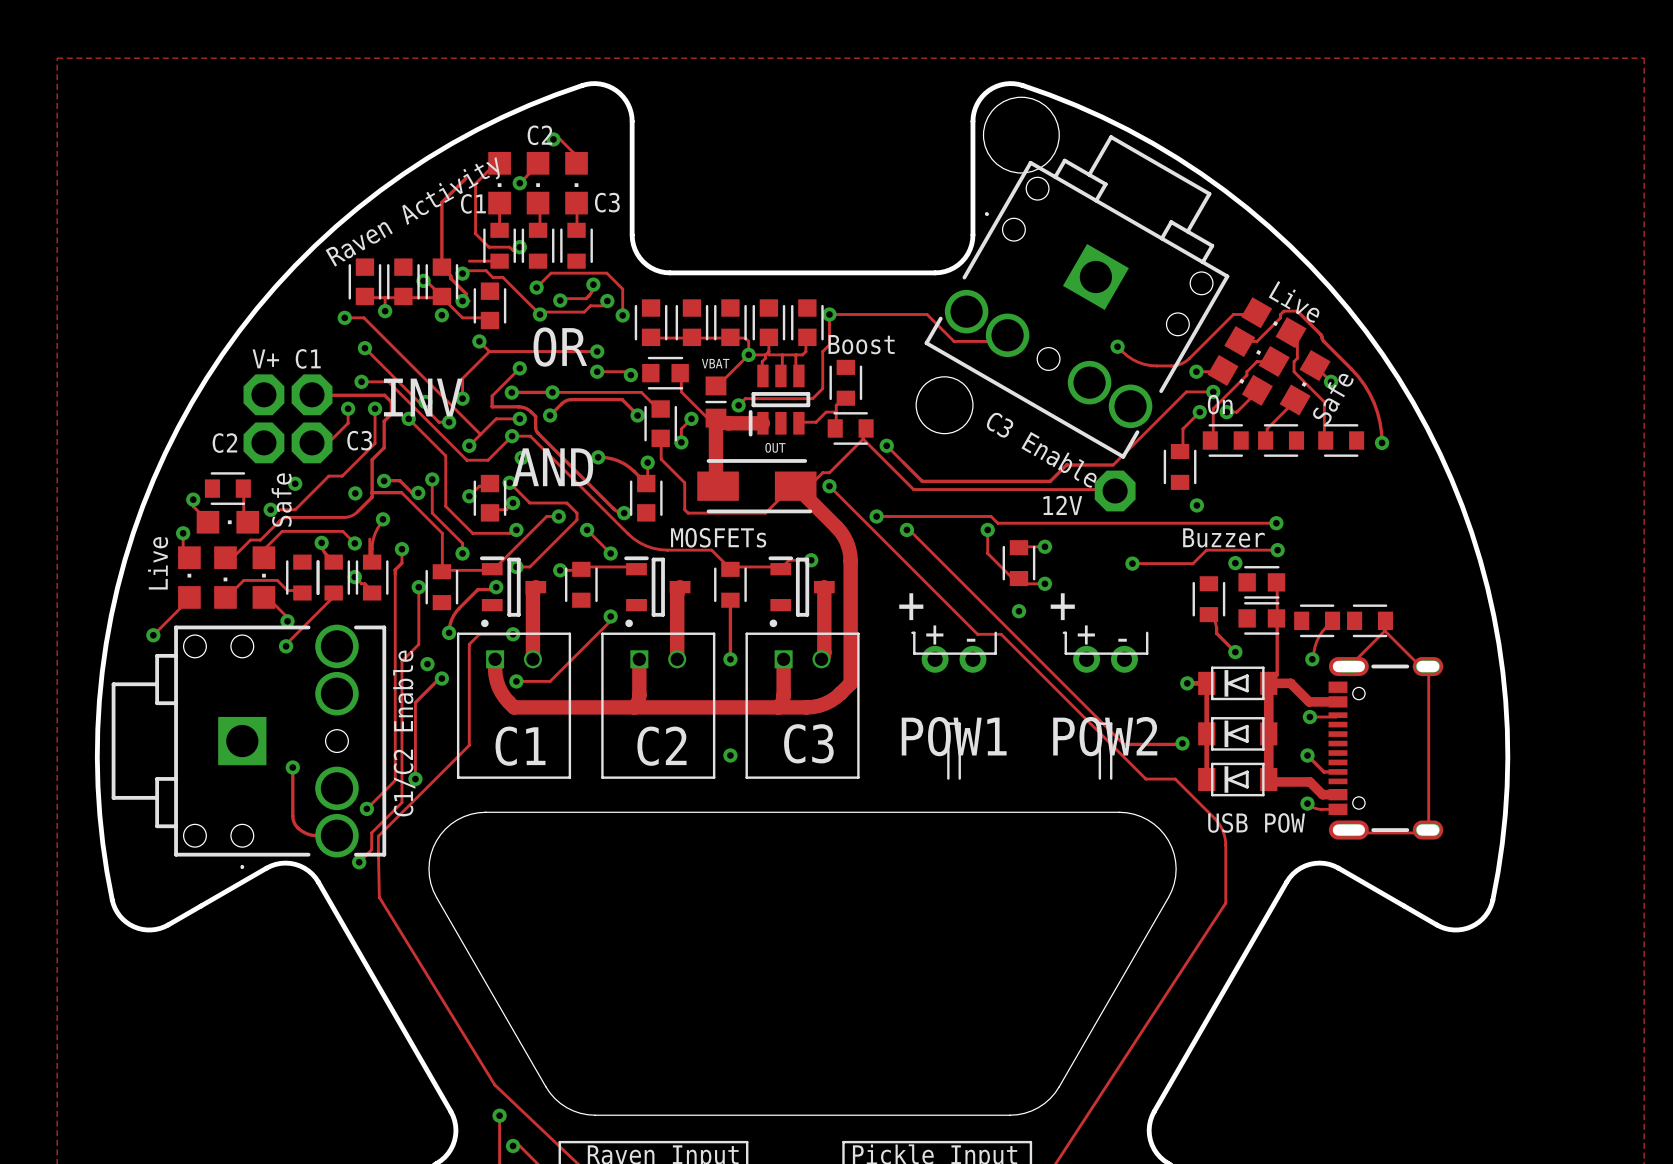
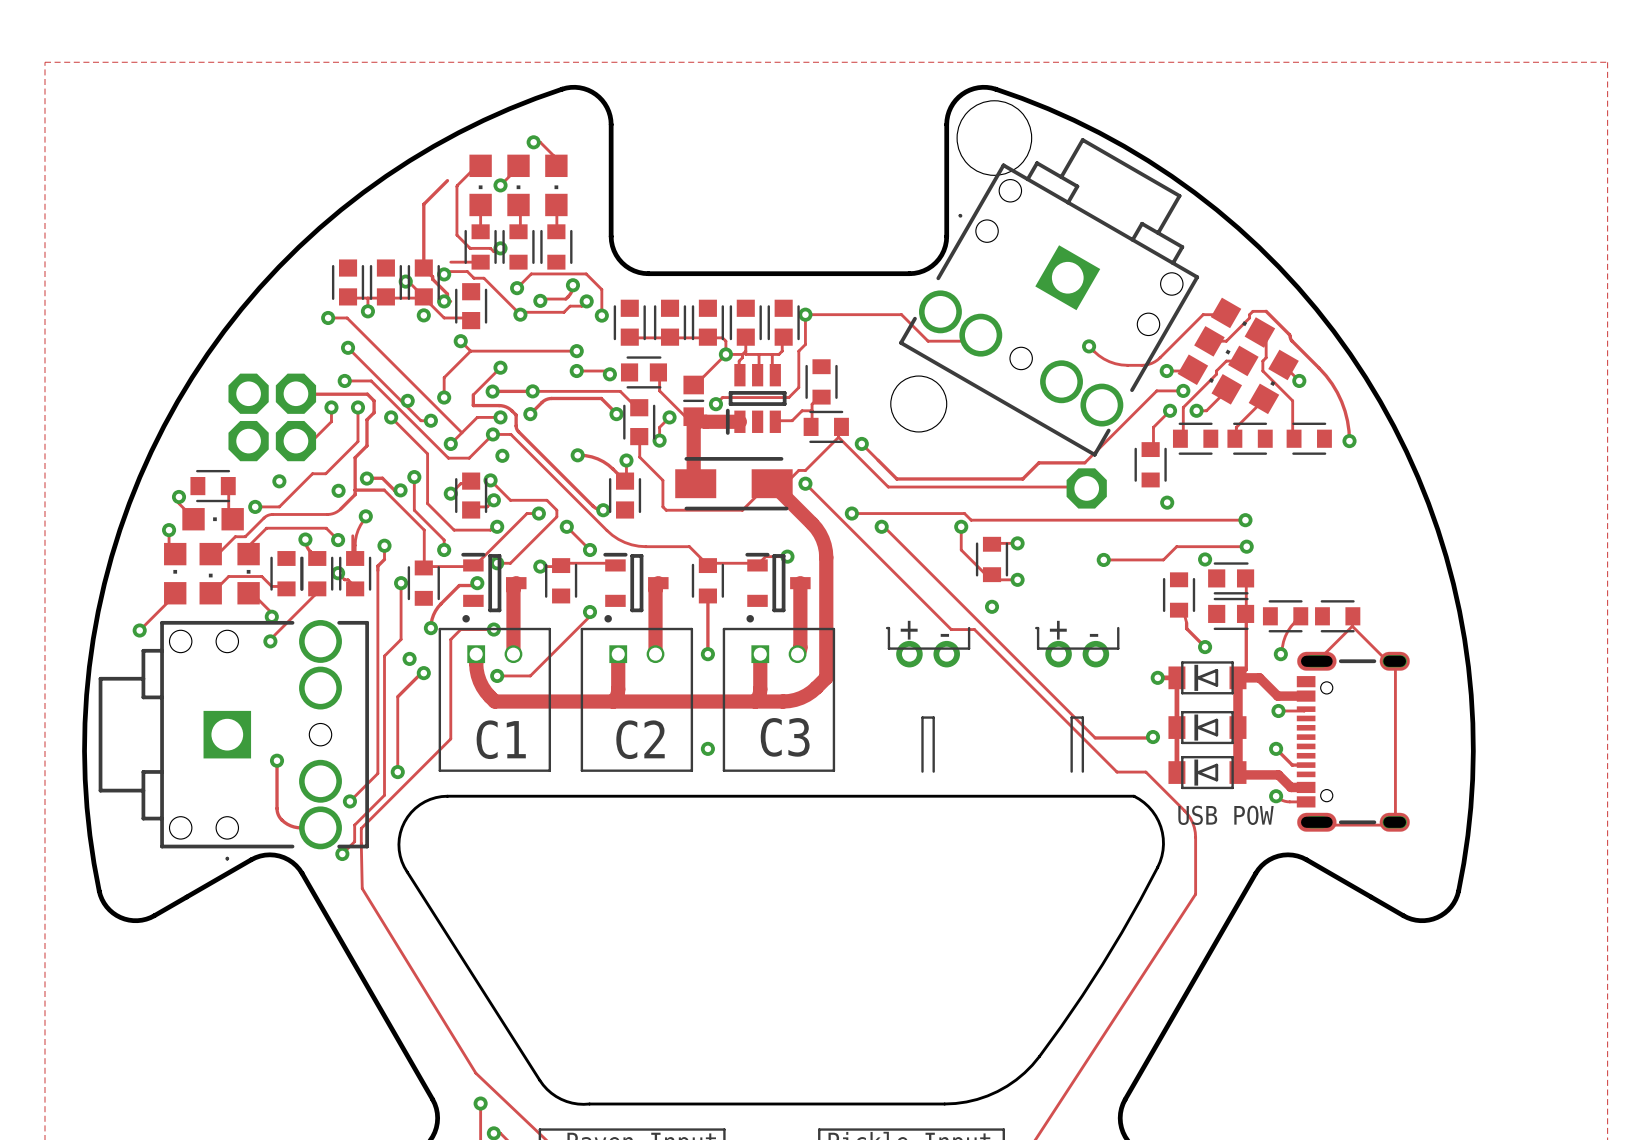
text: C2 (539, 135) -> none
text: C3 (607, 202) -> none
text: C1 (473, 203) -> none
text: Raven Activity (412, 211) -> none
text: Live (1294, 301) -> none
text: Boost (861, 344) -> none
text: OR (560, 347) -> none
text: V+ C1 (286, 358) -> none
text: VBAT (715, 363) -> none
text: INV (423, 397) -> none
text: Safe (1333, 399) -> none
text: On (1220, 404) -> none
text: C3 (359, 440) -> none
text: C2 (224, 443) -> none
text: OUT (775, 447) -> none
text: C3 Enable (1041, 449) -> none
text: AND (552, 467) -> none
text: Safe (281, 500) -> none
text: 12V (1062, 505) -> none
text: MOSFETs (718, 537) -> none
text: Buzzer (1223, 537) -> none
text: Live (158, 563) -> none
text: + (911, 606) -> none
text: + (1062, 606) -> none
text: C1/C2 Enable (404, 733) -> none
text: POW1 (954, 736) -> none
text: POW2 (1105, 736) -> none
board edge: none -> (447, 796) (1134, 796) (1144, 802) (1155, 815) (1160, 826) (1163, 844) (1160, 861) (1140, 900) (1082, 995) (1032, 1065) (1016, 1079) (997, 1091) (977, 1099) (944, 1104) (577, 1104) (556, 1096) (543, 1085) (401, 861) (399, 838) (407, 817) (425, 801) (447, 796)
board edge: (485, 812) (1119, 812) (1126, 812) (1147, 819) (1164, 834) (1174, 854) (1175, 876) (1168, 897) (1059, 1086) (1044, 1103) (1031, 1110) (1010, 1115) (587, 1114) (566, 1107) (550, 1093) (436, 897) (430, 883) (428, 869) (430, 854) (440, 834) (457, 819) (471, 814) (478, 812) (485, 812) -> none

